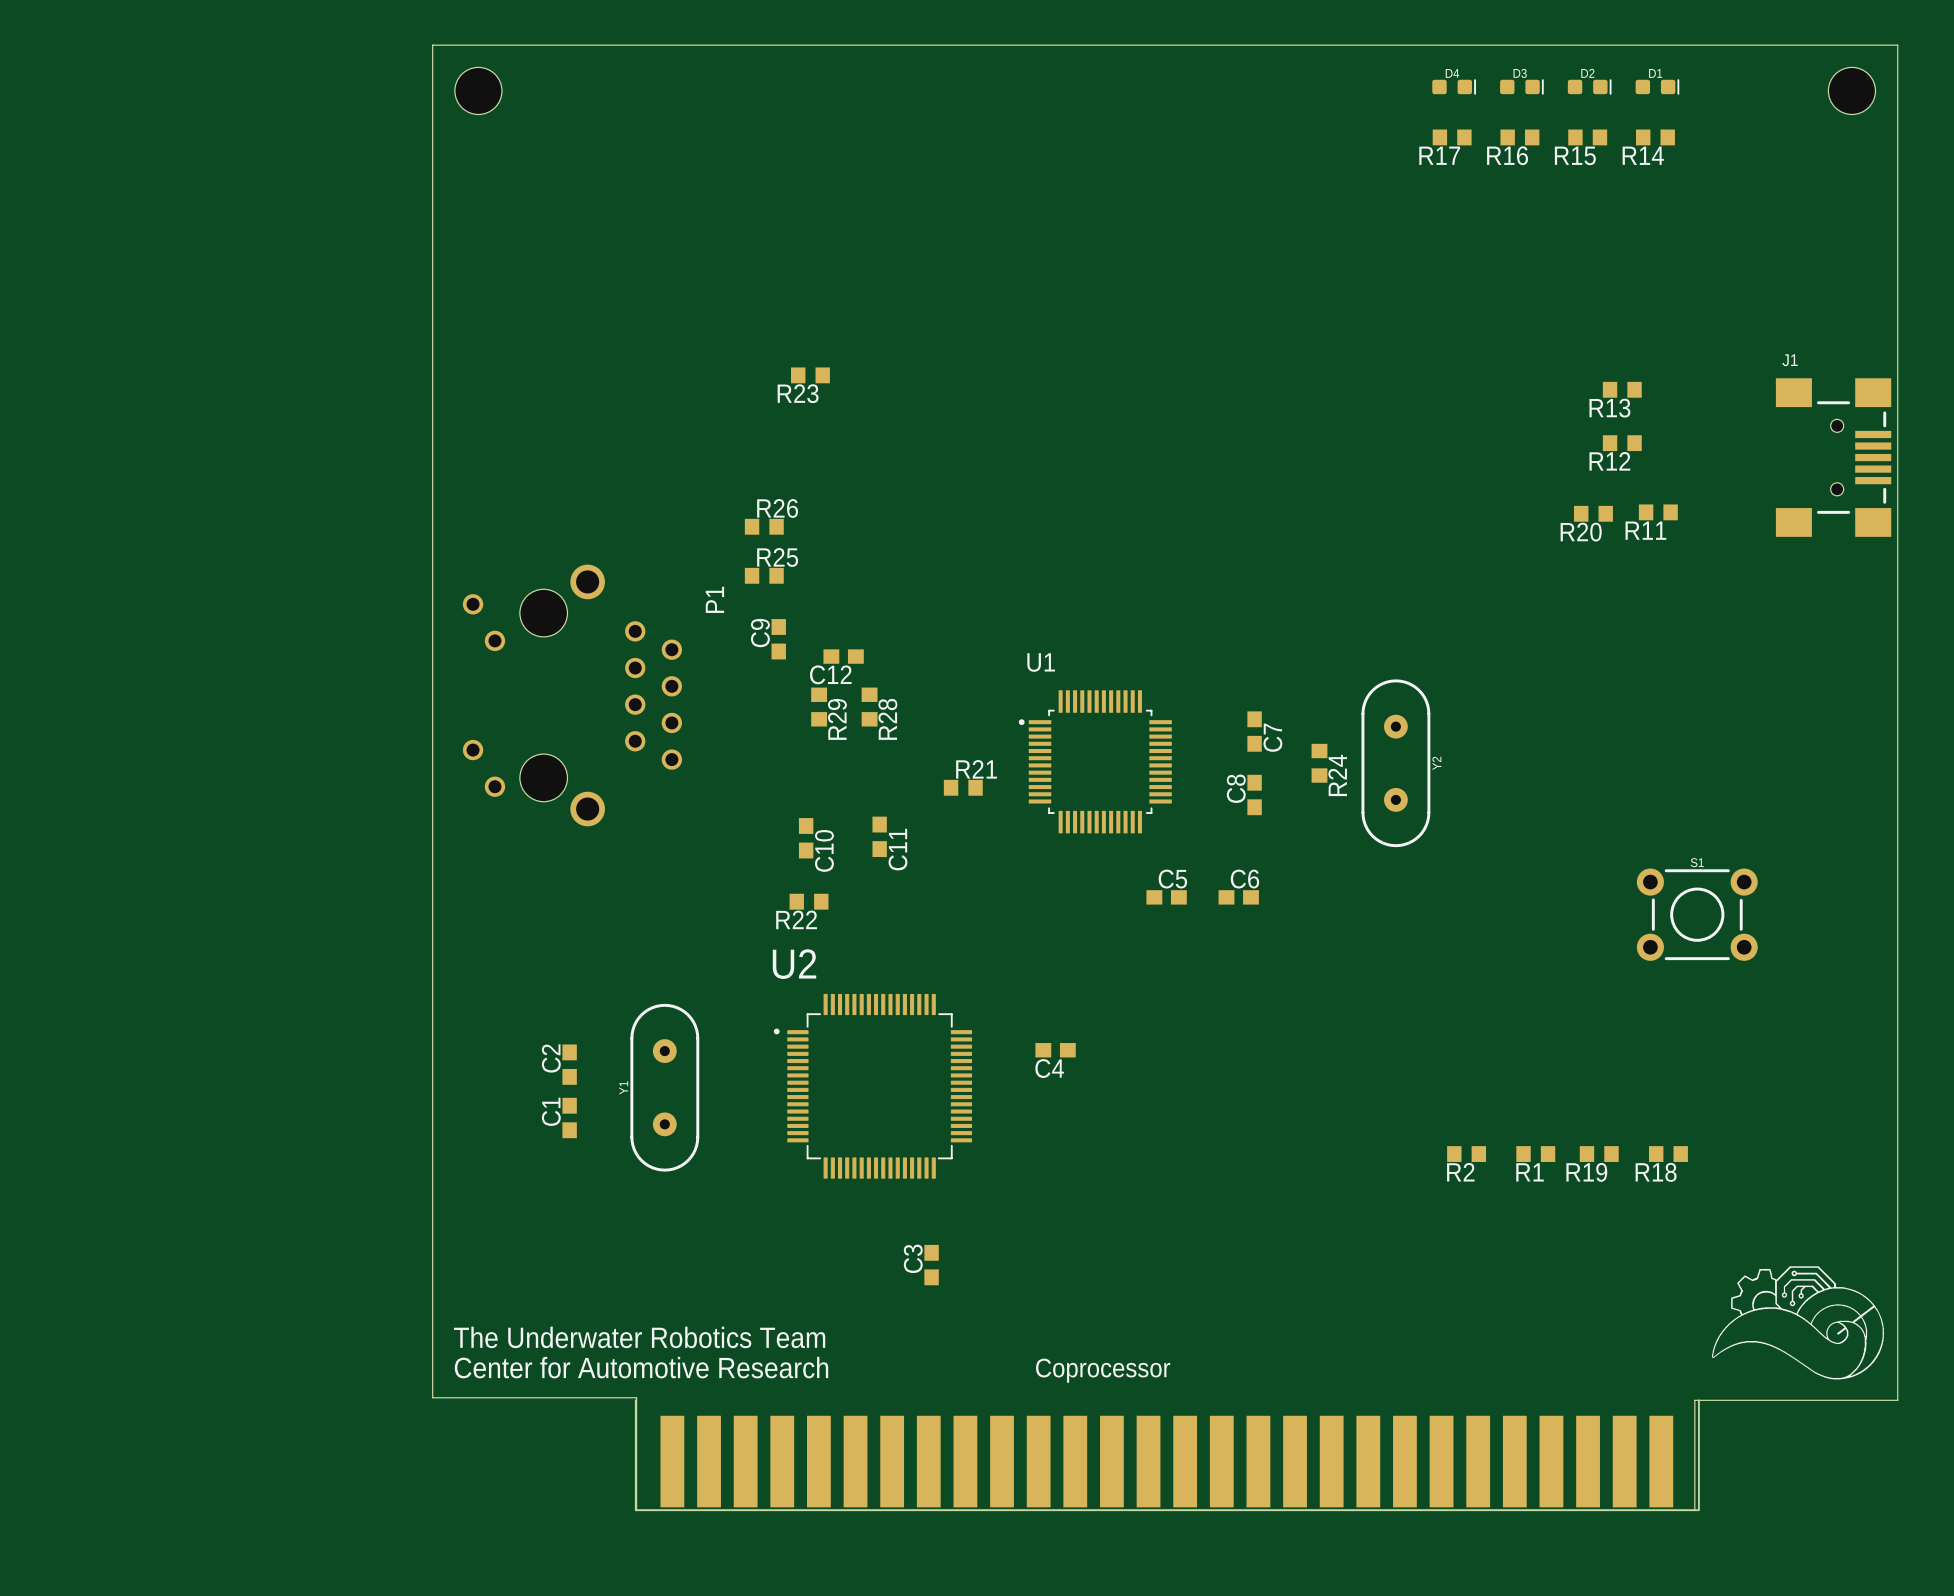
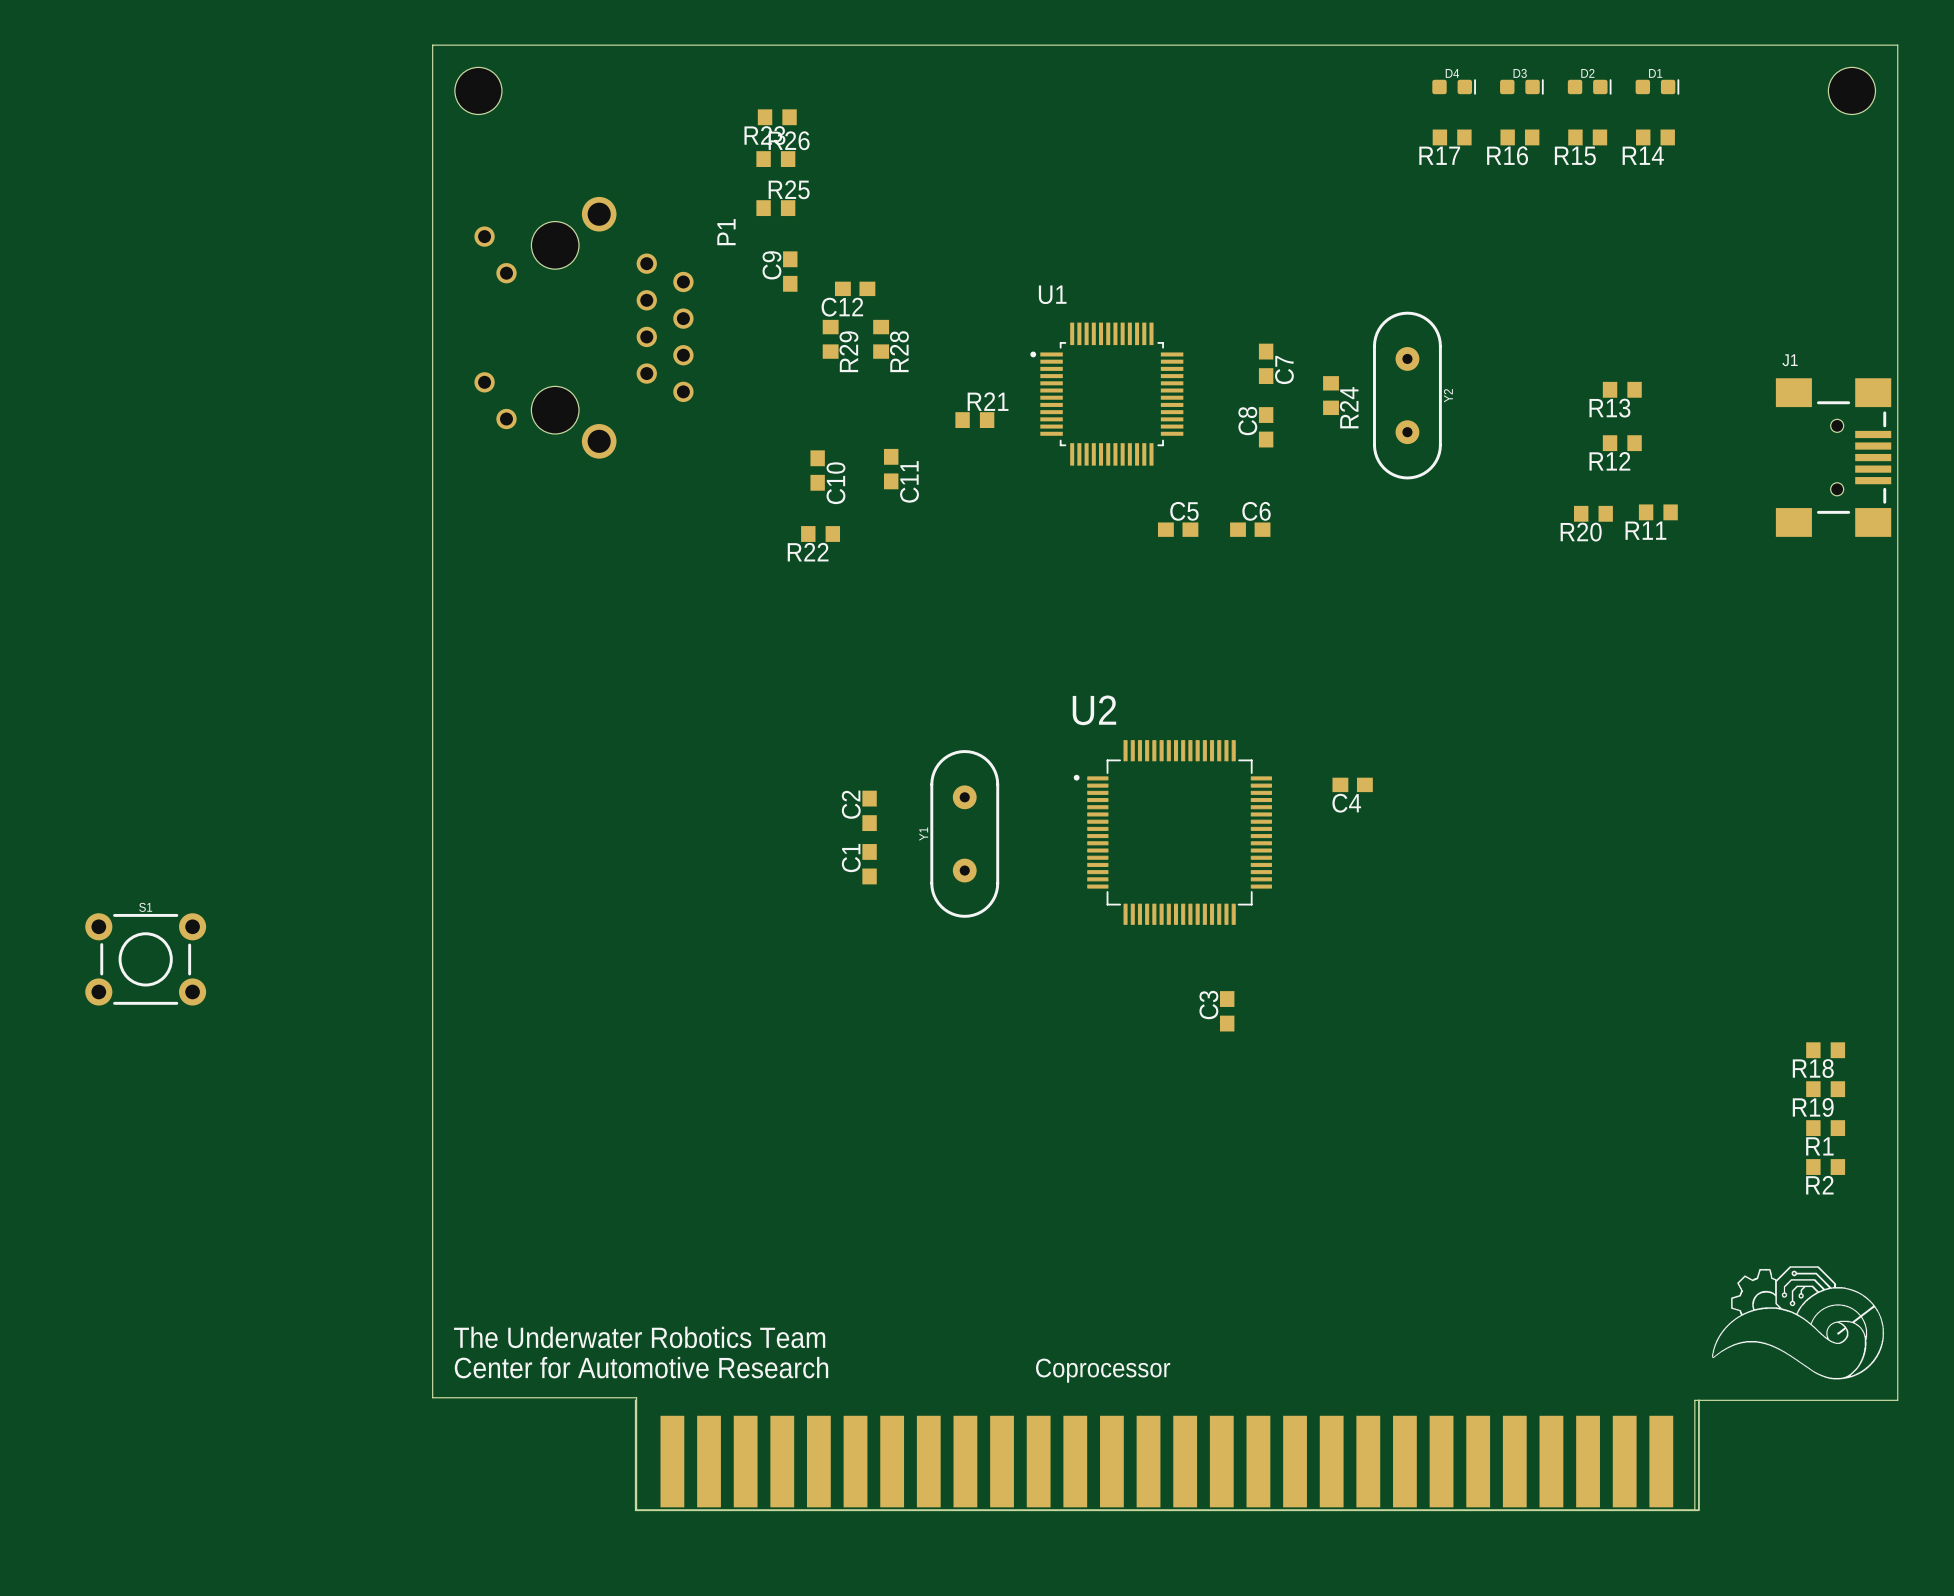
R23 position: (810, 375) -> (777, 117)
R26 position: (764, 526) -> (775, 159)
R25 position: (764, 575) -> (775, 208)
C9 position: (778, 639) -> (790, 271)
C12 position: (843, 656) -> (855, 288)
P1 position: (572, 695) -> (583, 327)
R29 position: (819, 707) -> (830, 339)
R28 position: (869, 707) -> (881, 339)
C7 position: (1254, 731) -> (1266, 363)
U1 position: (1095, 761) -> (1106, 394)
R24 position: (1319, 763) -> (1331, 395)
Y2 position: (1395, 763) -> (1407, 395)
R21 position: (963, 787) -> (974, 420)
C8 position: (1254, 794) -> (1266, 427)
C11 position: (879, 836) -> (891, 469)
C10 position: (806, 838) -> (817, 470)
C5 position: (1166, 897) -> (1178, 529)
C6 position: (1238, 897) -> (1250, 529)
R22 position: (809, 901) -> (820, 533)
S1 position: (1697, 914) -> (145, 959)
C4 position: (1055, 1050) -> (1352, 784)
C2 position: (569, 1064) -> (869, 810)
U2 position: (872, 1086) -> (1172, 832)
Y1 position: (664, 1087) -> (964, 833)
C1 position: (569, 1118) -> (869, 864)
R2 position: (1466, 1154) -> (1825, 1167)
R1 position: (1535, 1154) -> (1825, 1128)
R19 position: (1599, 1154) -> (1825, 1089)
R18 position: (1668, 1154) -> (1825, 1050)
C3 position: (931, 1265) -> (1227, 1011)

